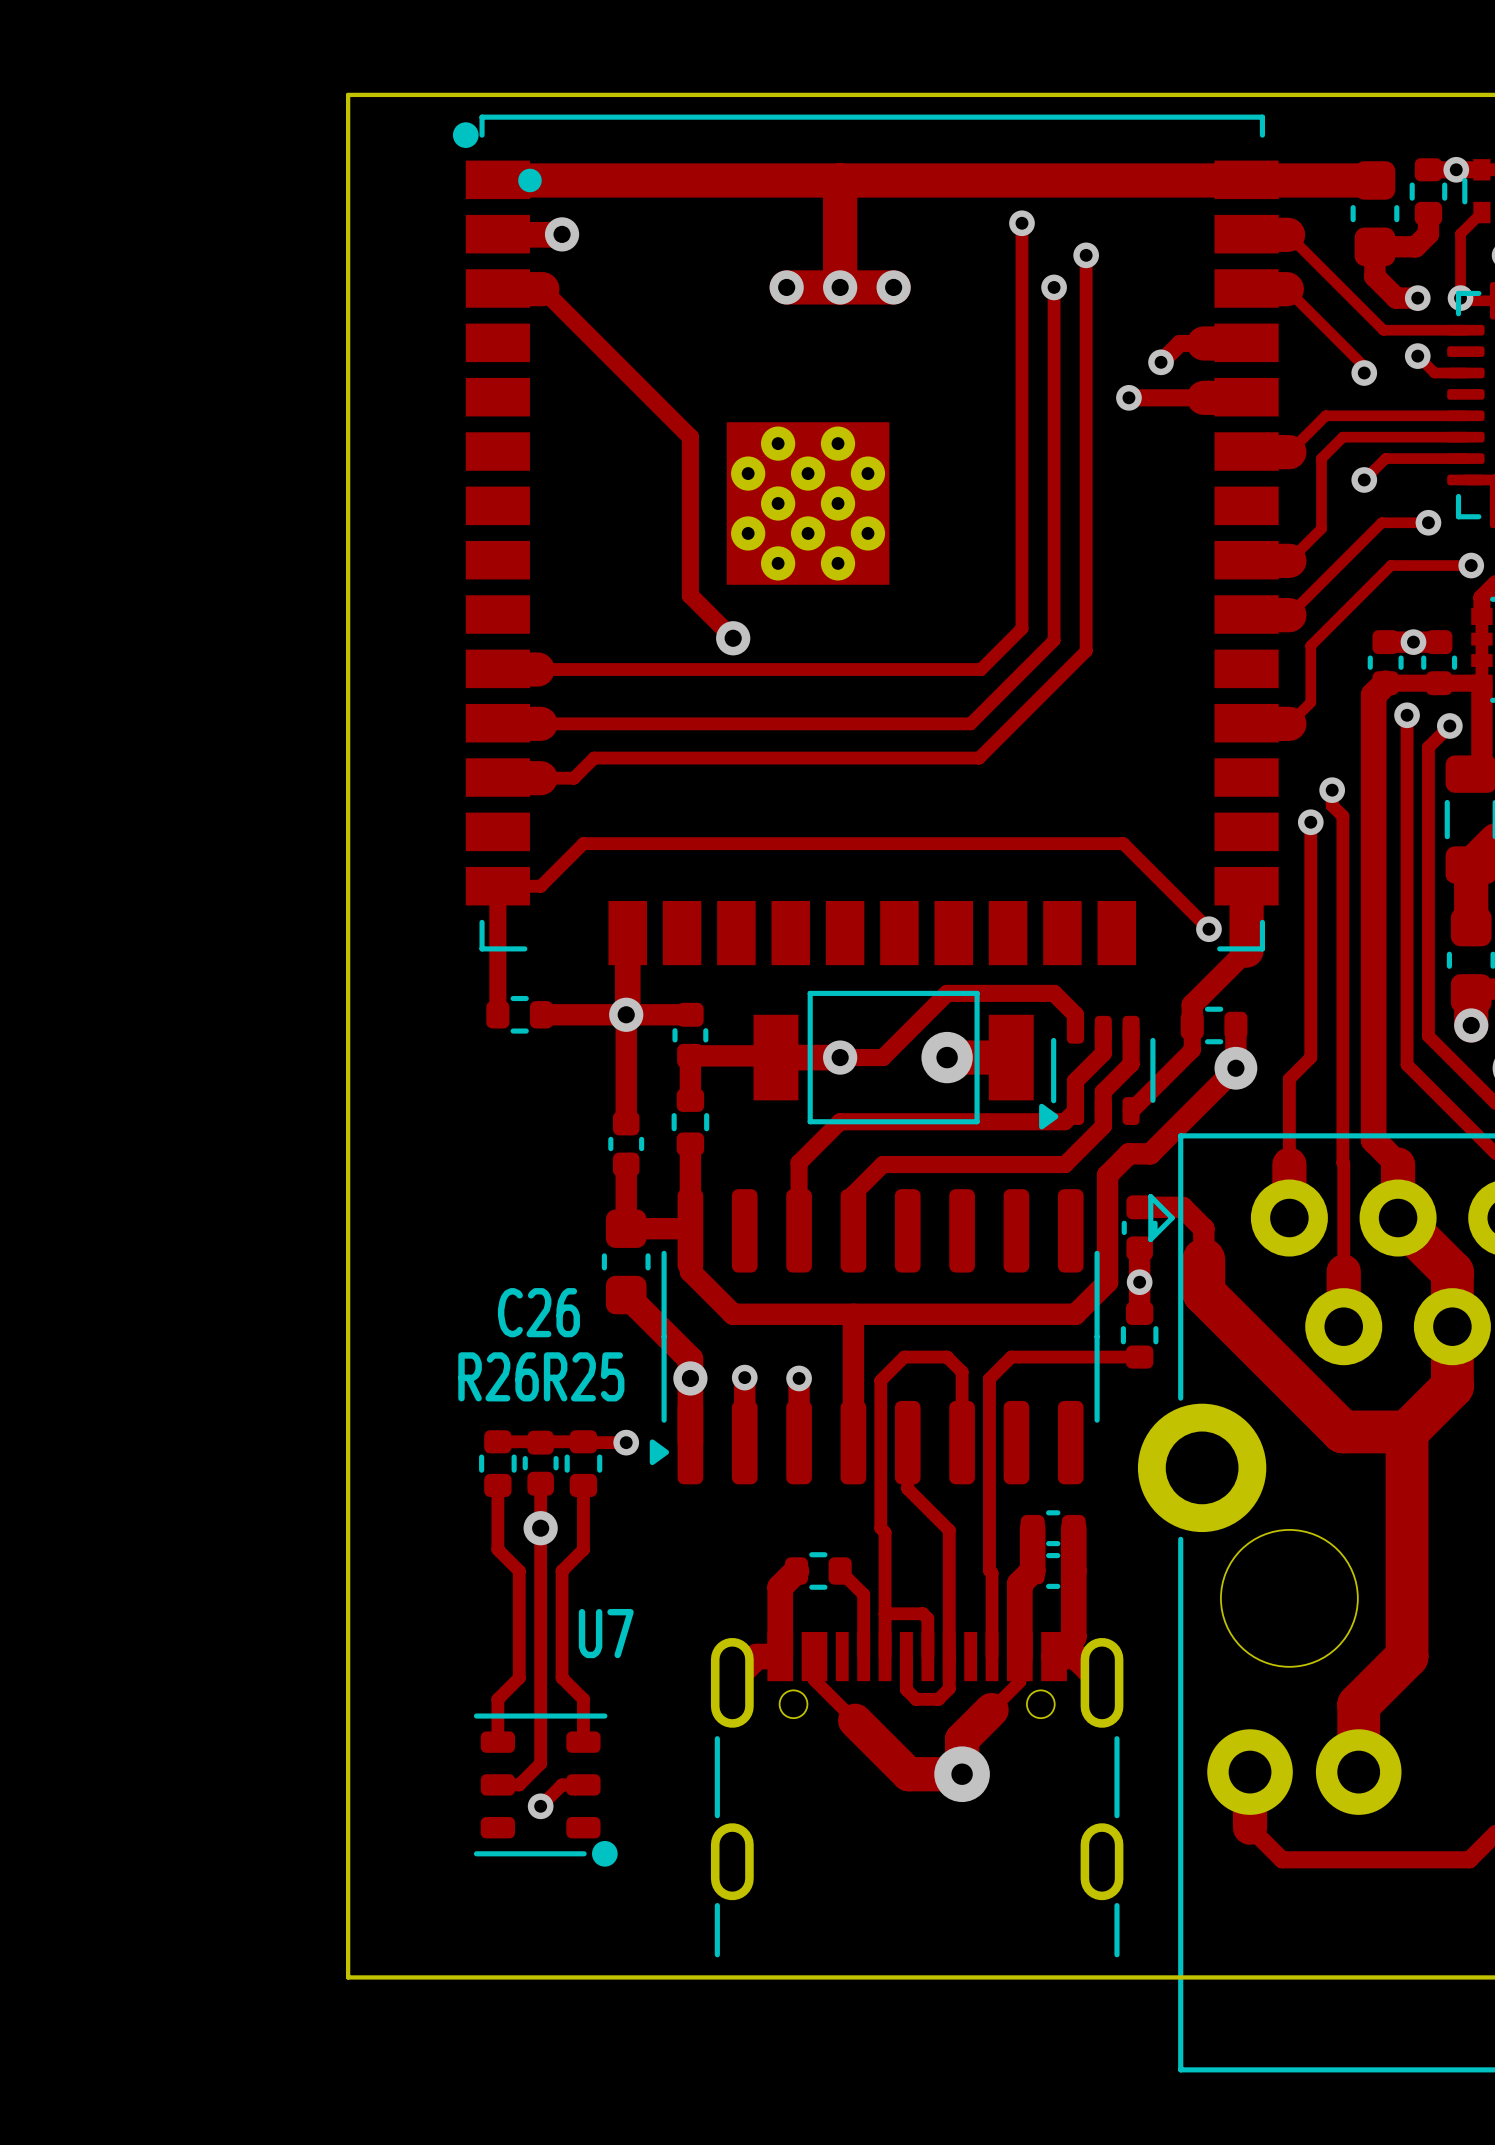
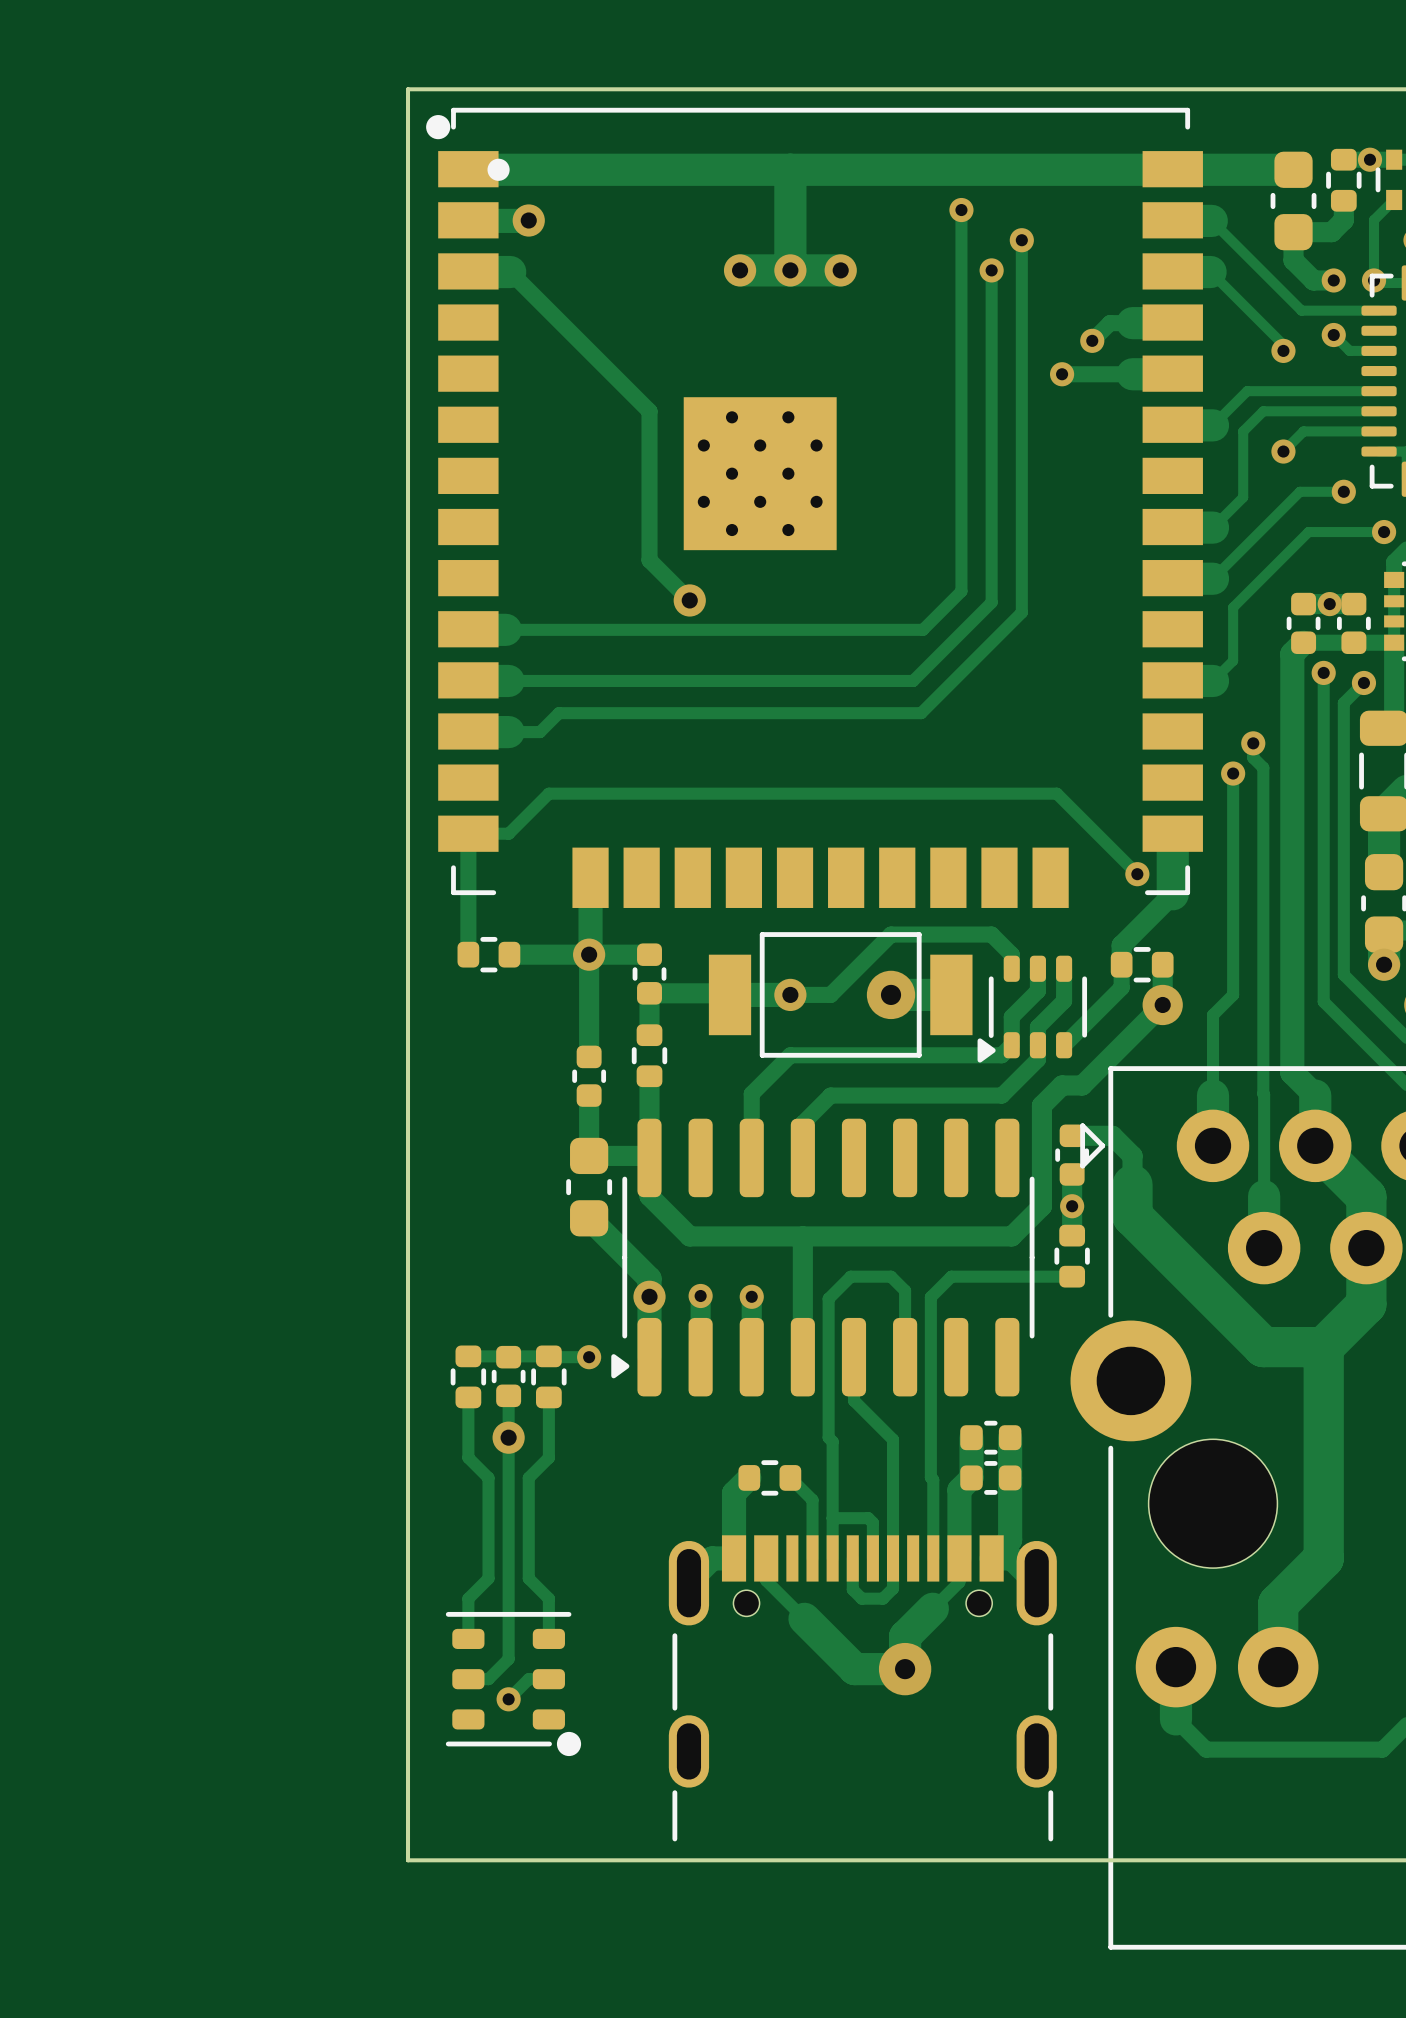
board edge: (433, 94) (348, 94) (348, 1977) (433, 1977) -> (408, 89) (408, 1860)
C26 name: C26 (538, 1312) -> none
R26 name: R26 (498, 1376) -> none
R25 name: R25 (584, 1376) -> none
U7 name: U7 (606, 1633) -> none

